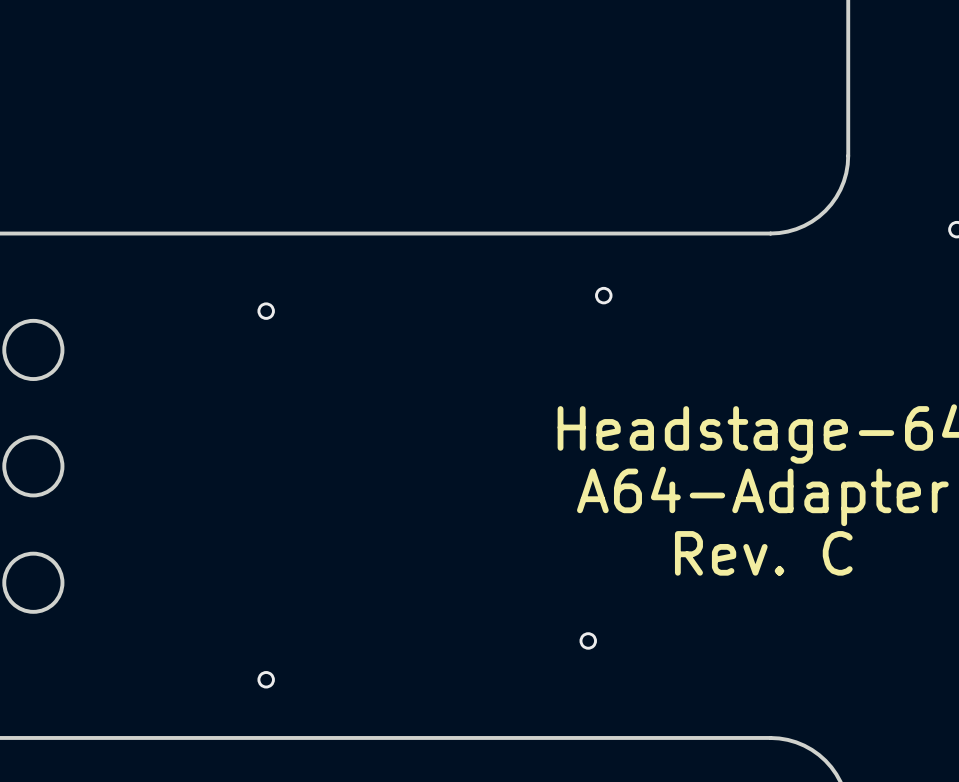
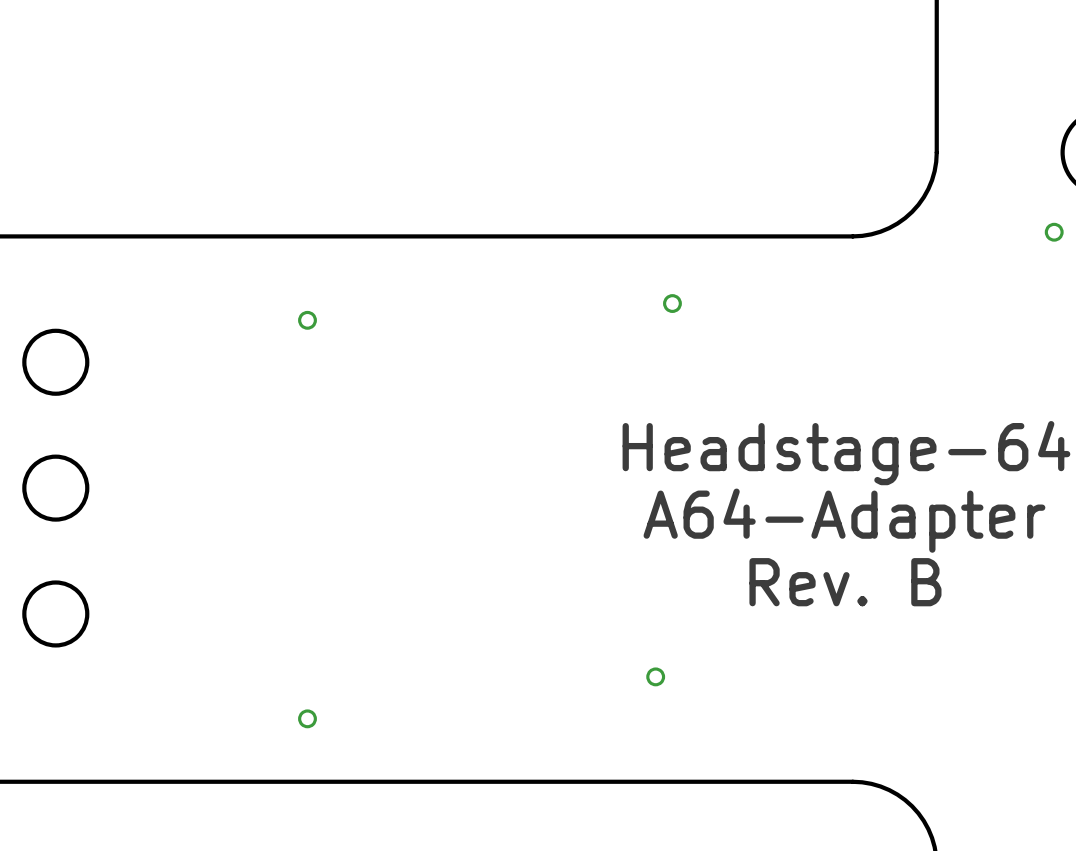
text: Rev. C (763, 553) -> Rev. B (845, 582)

